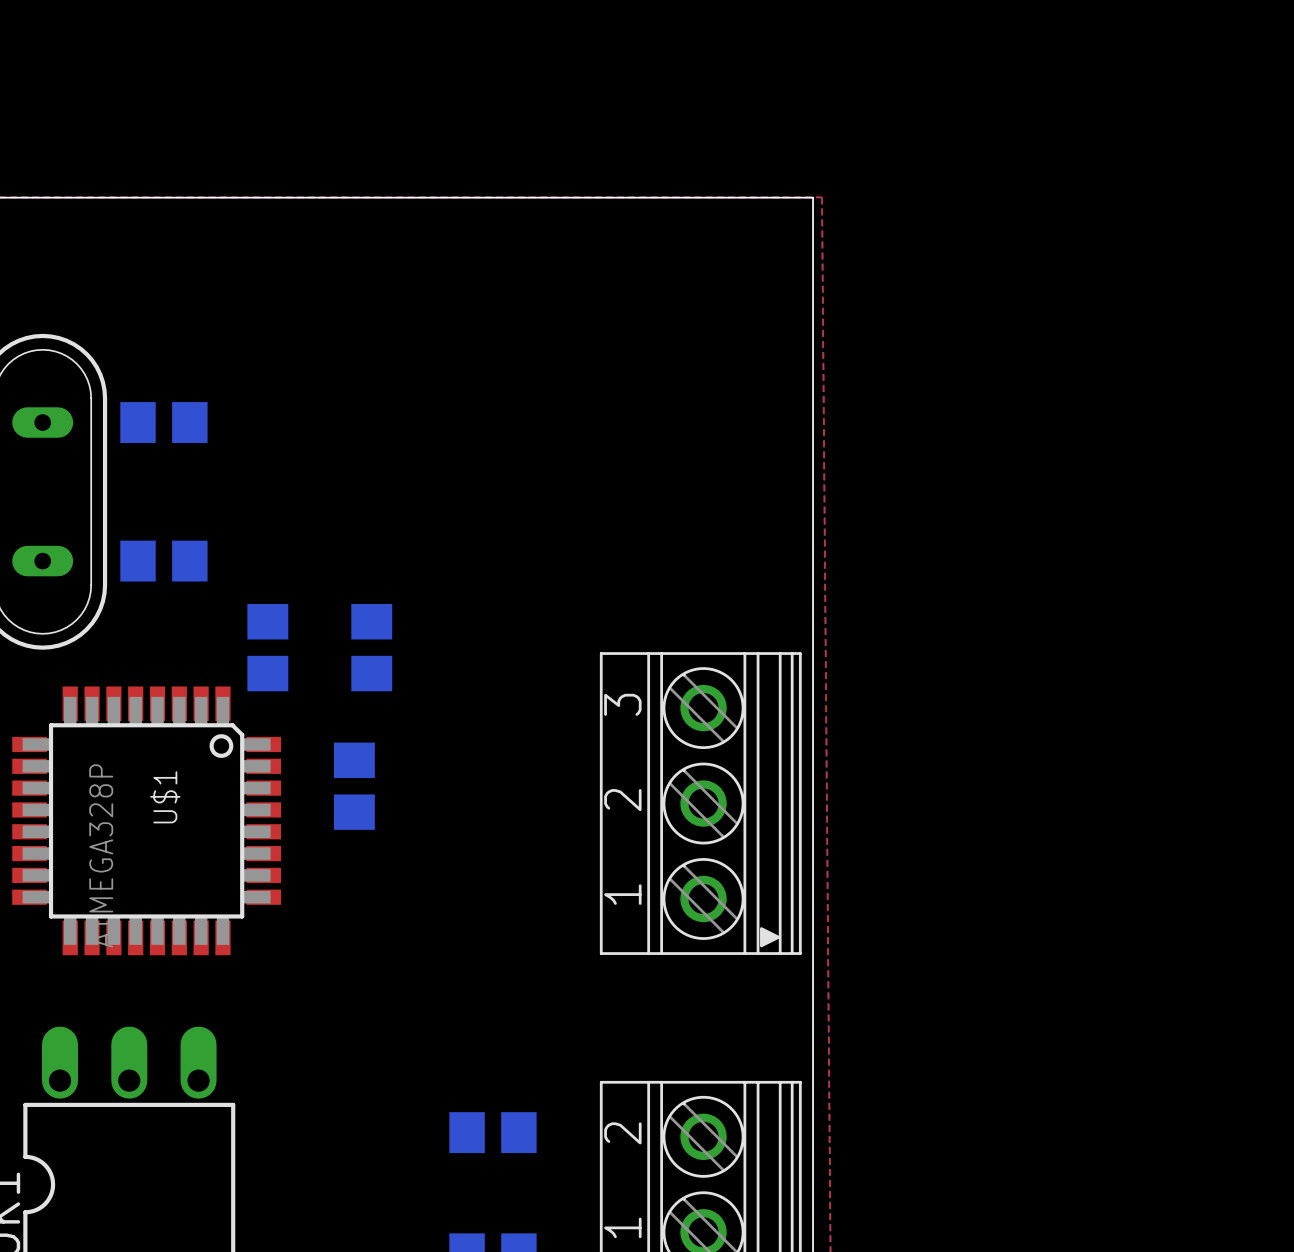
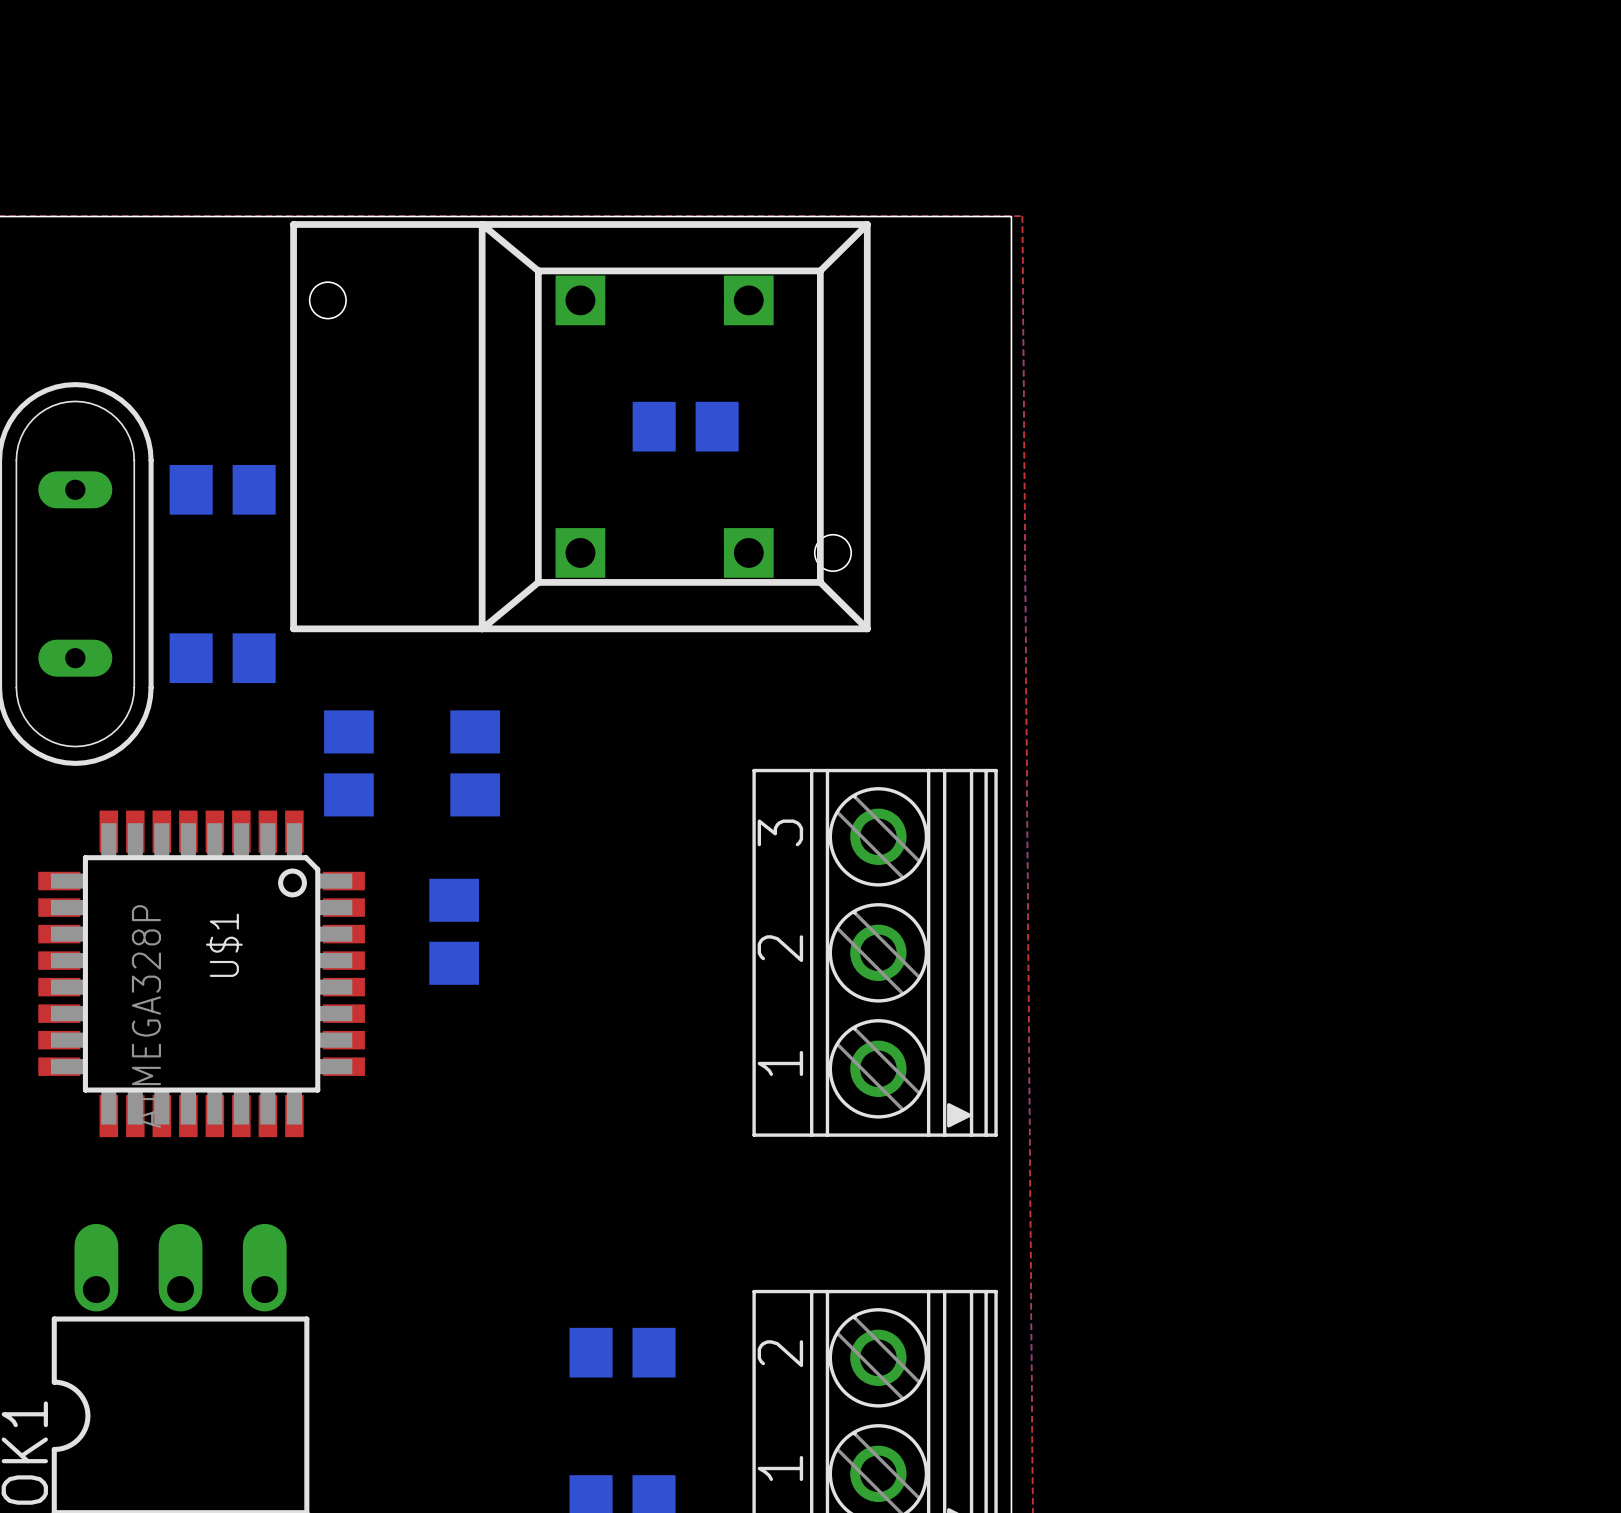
part: none -> (580, 426)
part: none -> (685, 426)

